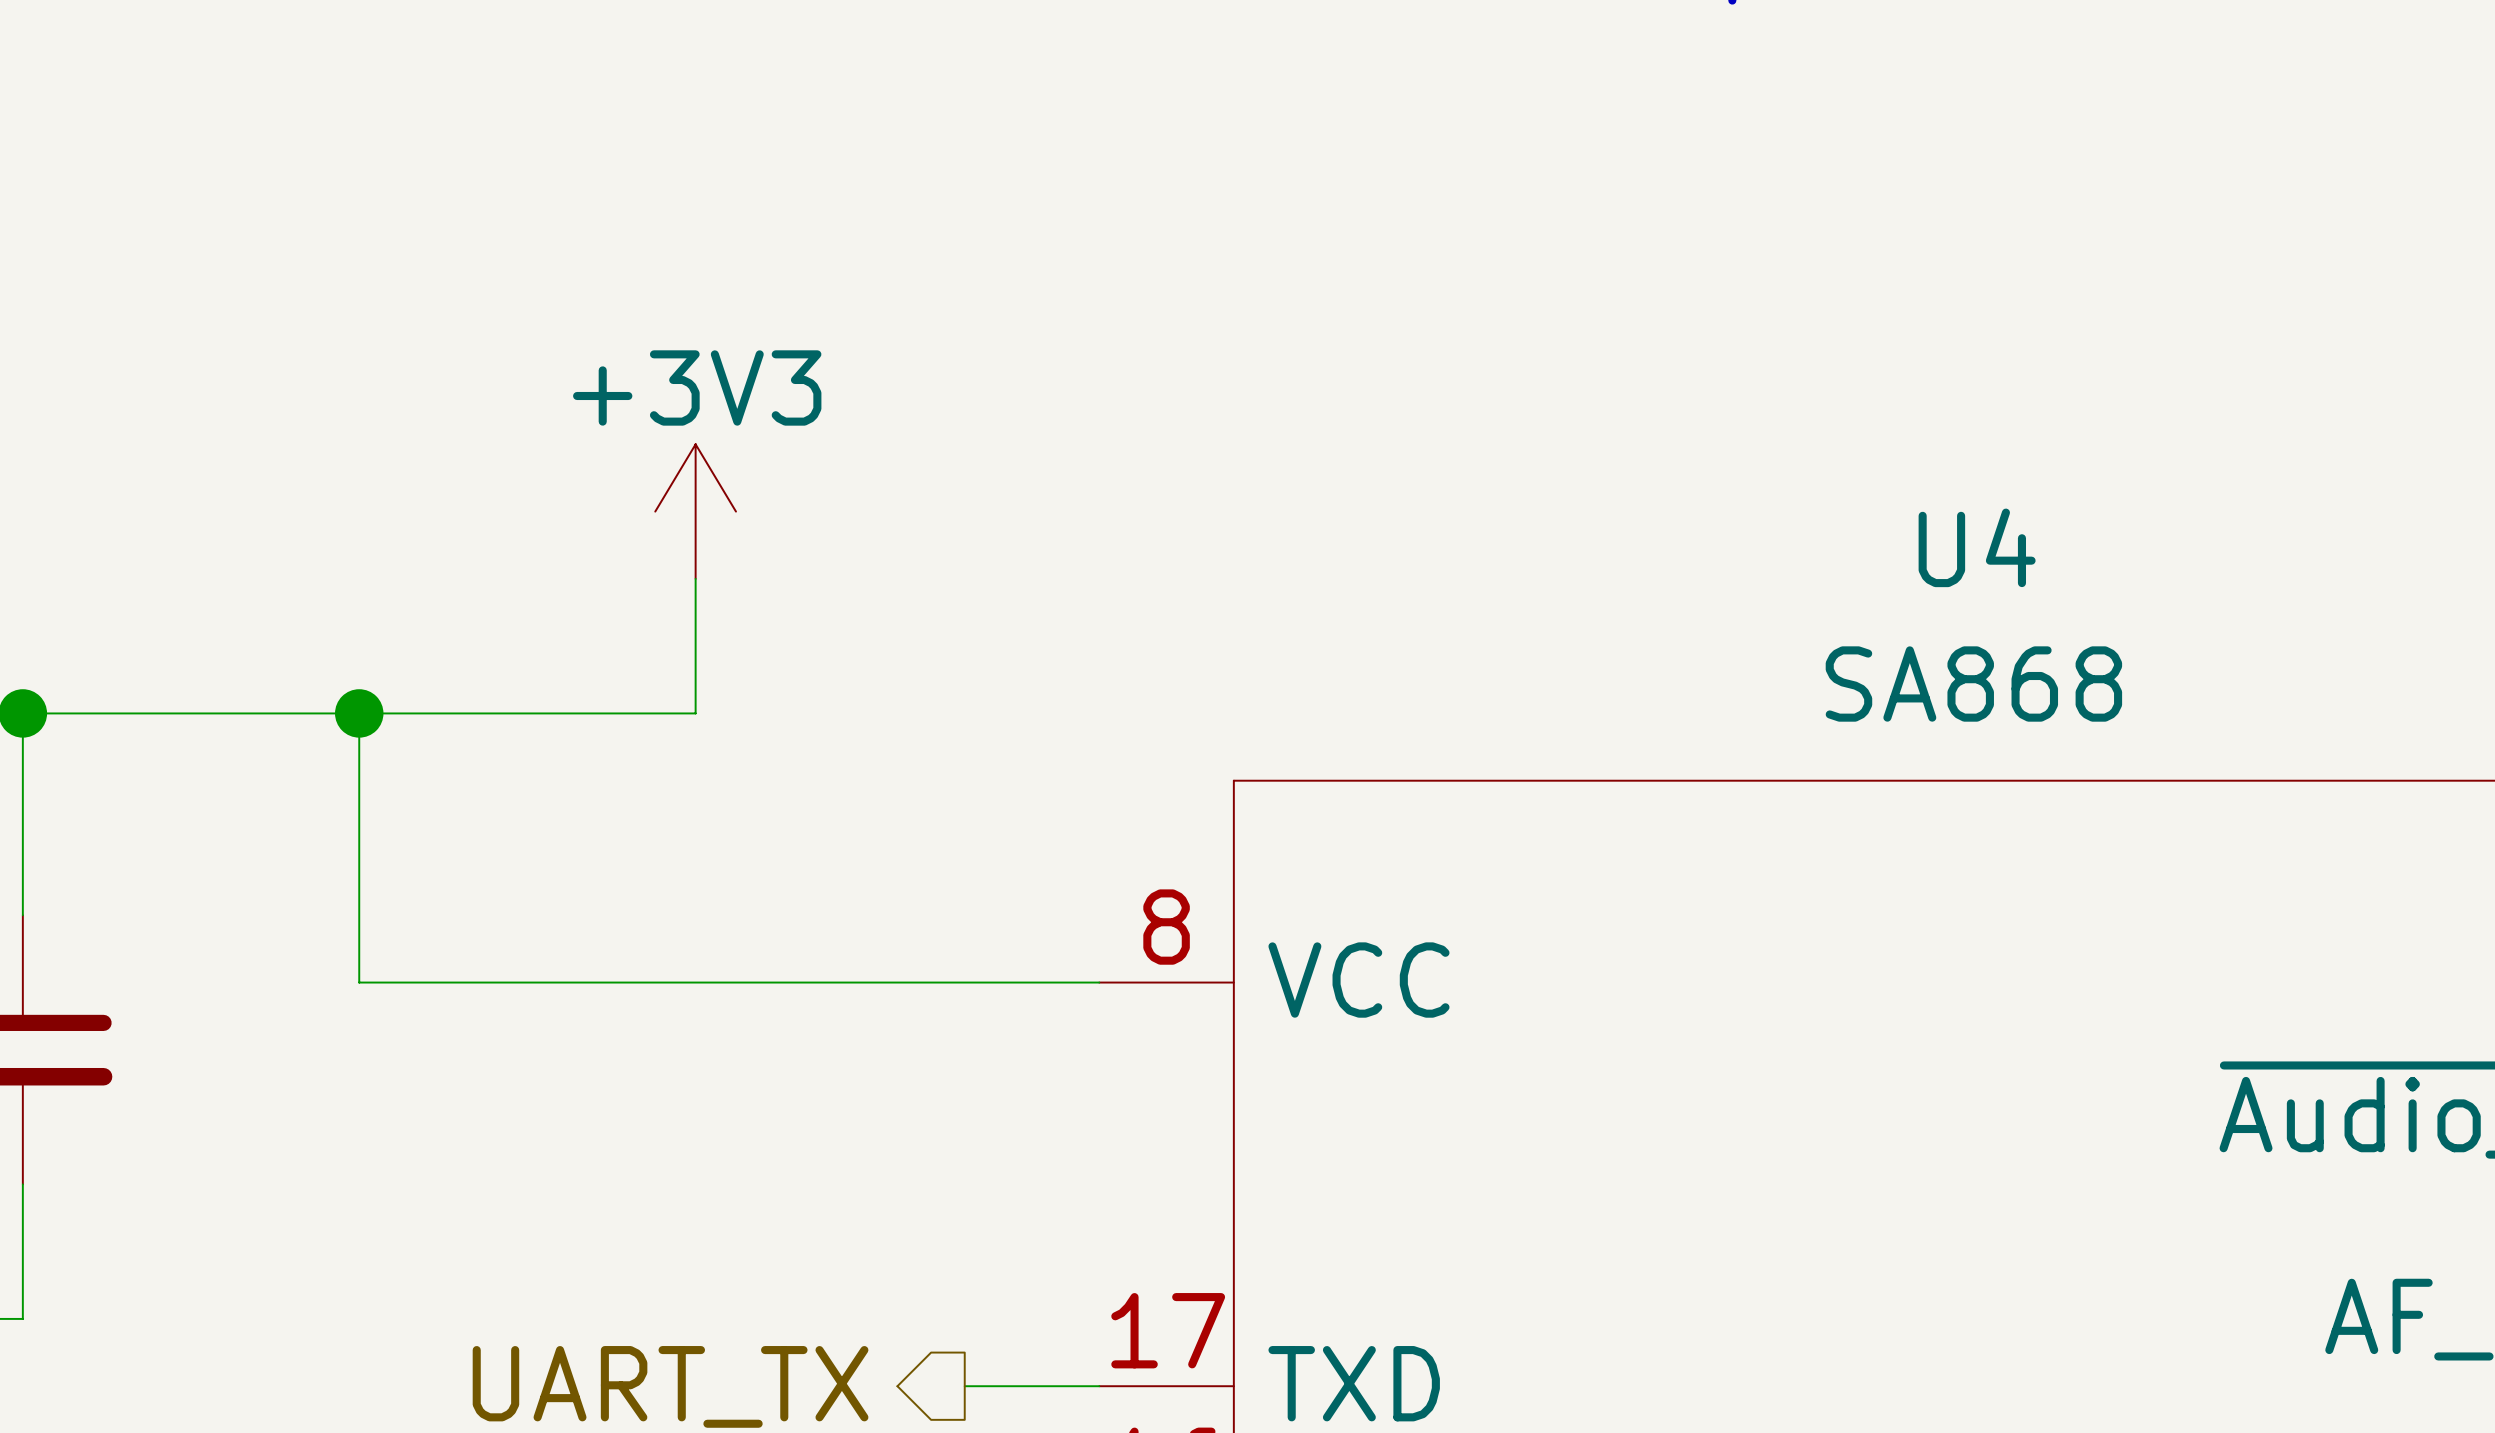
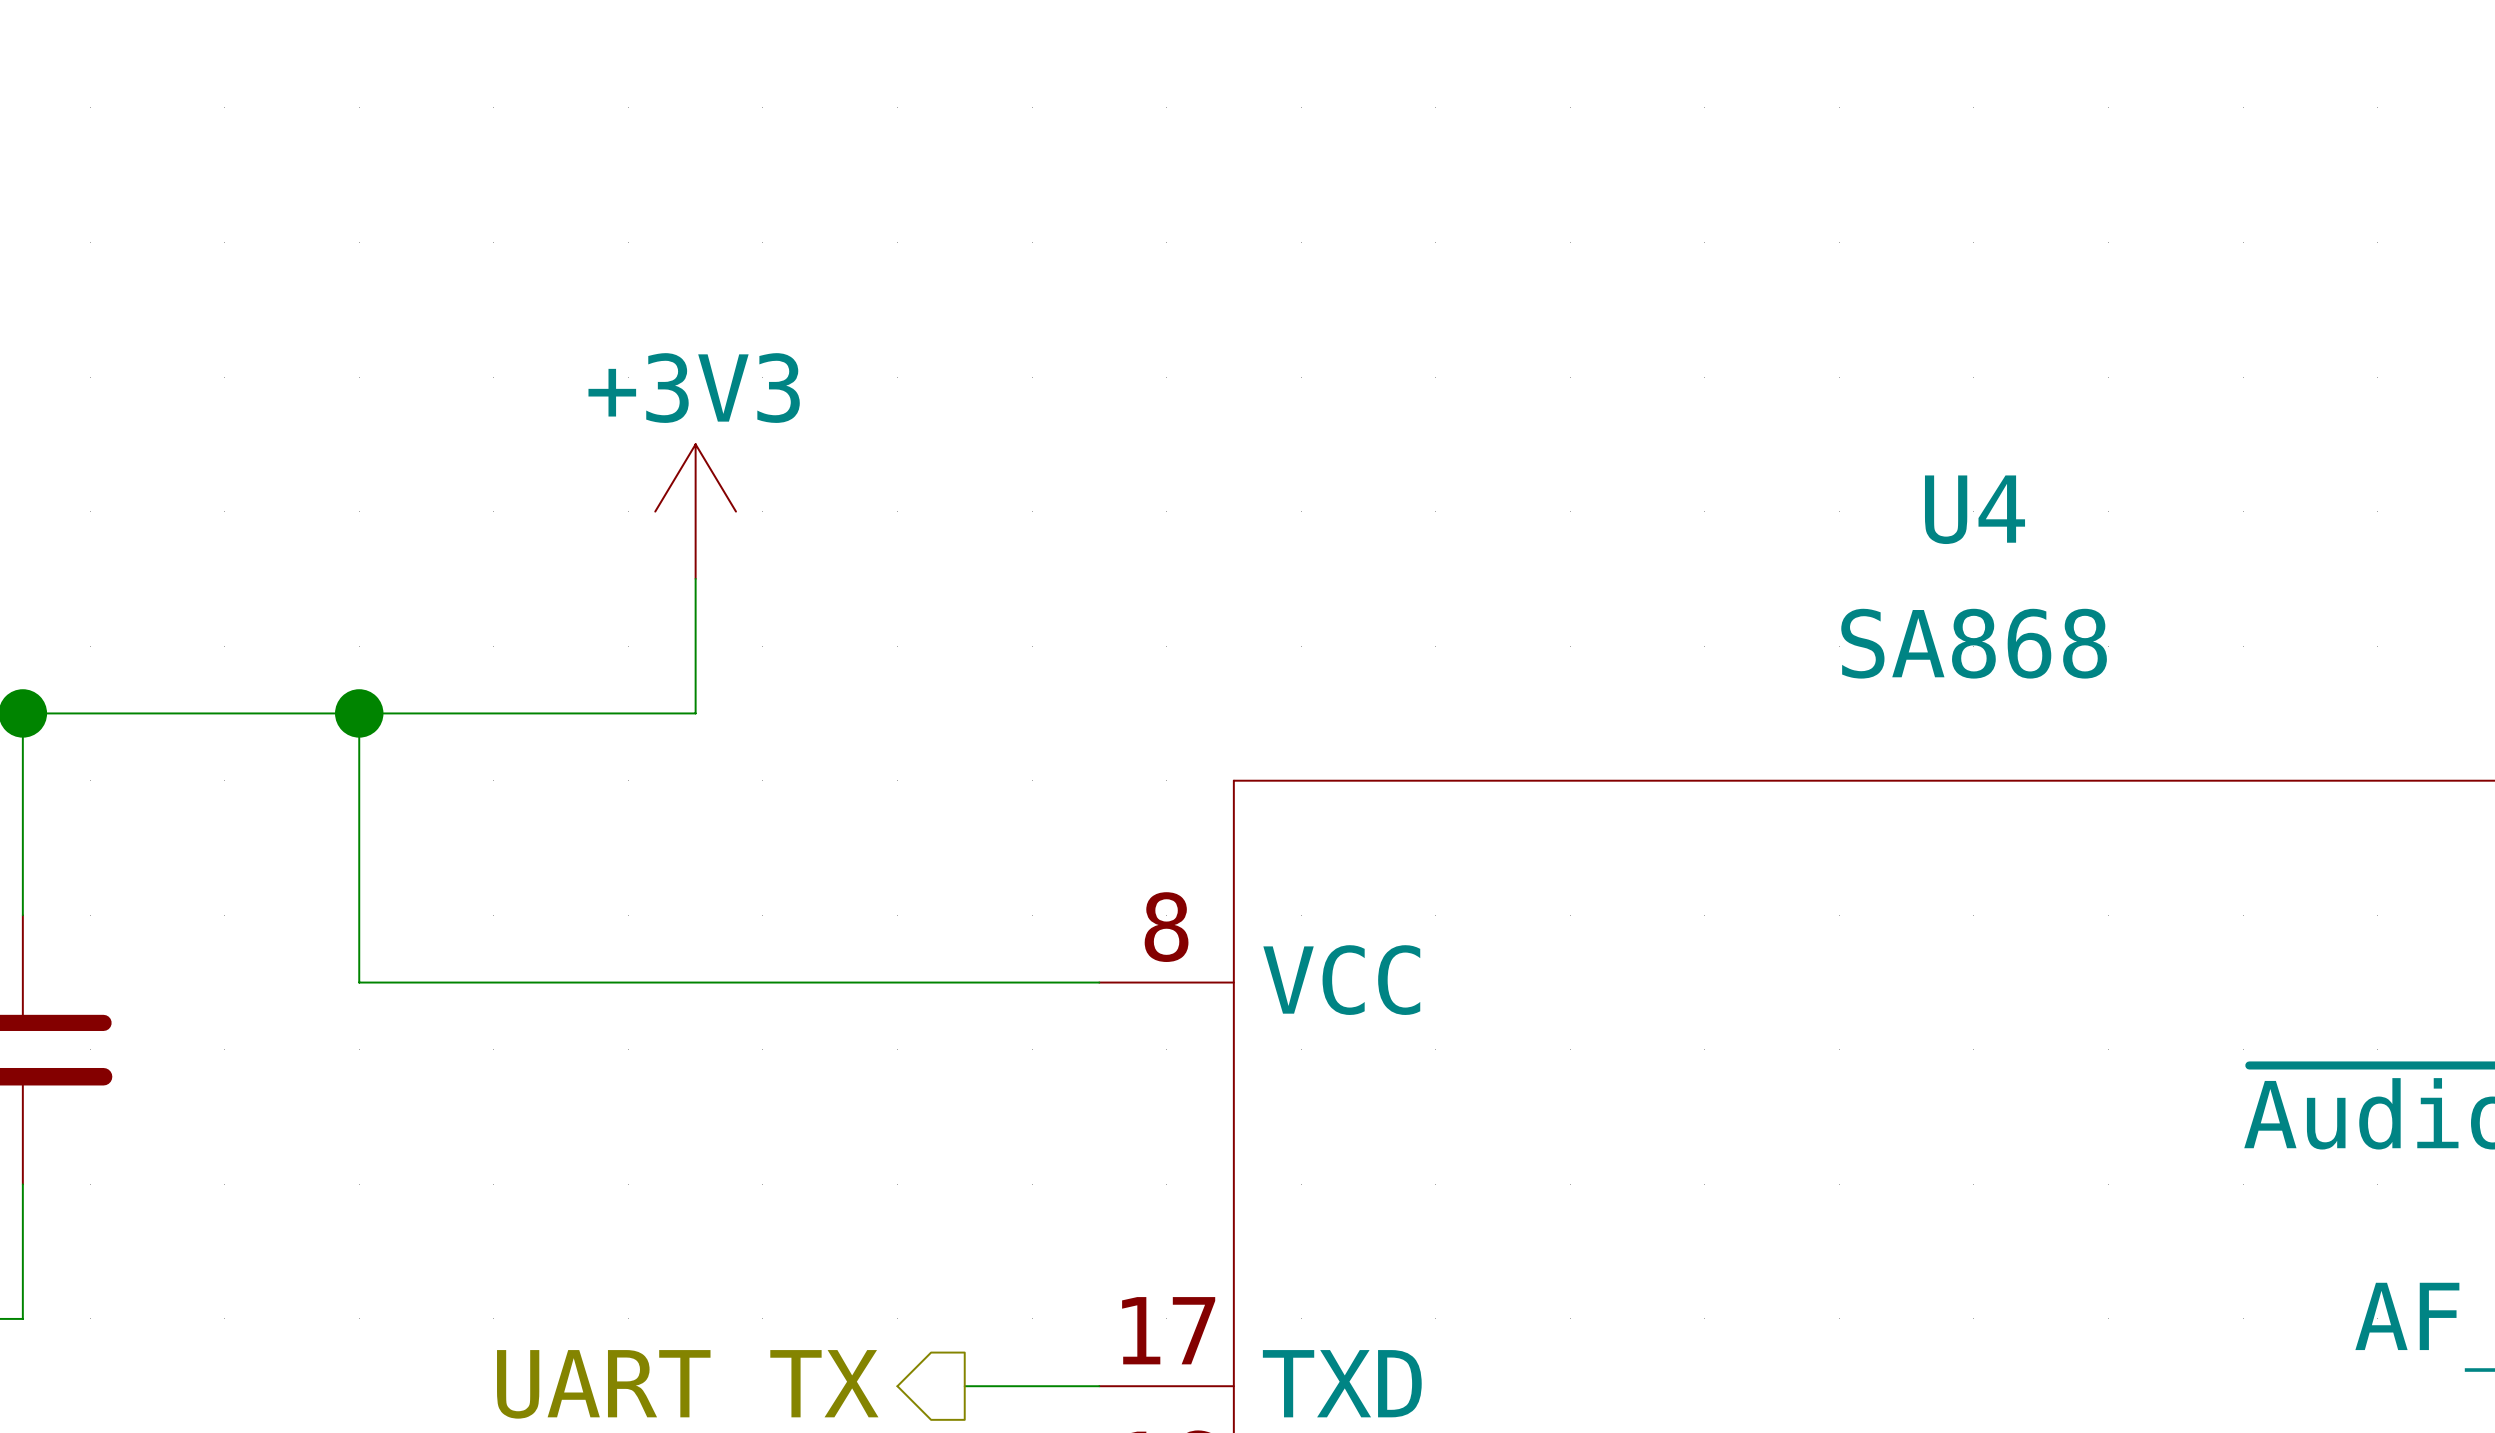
U4 name position: U4 (1977, 547) -> U4 (1975, 509)
U4 value position: SA868 (1973, 684) -> SA868 (1974, 643)

